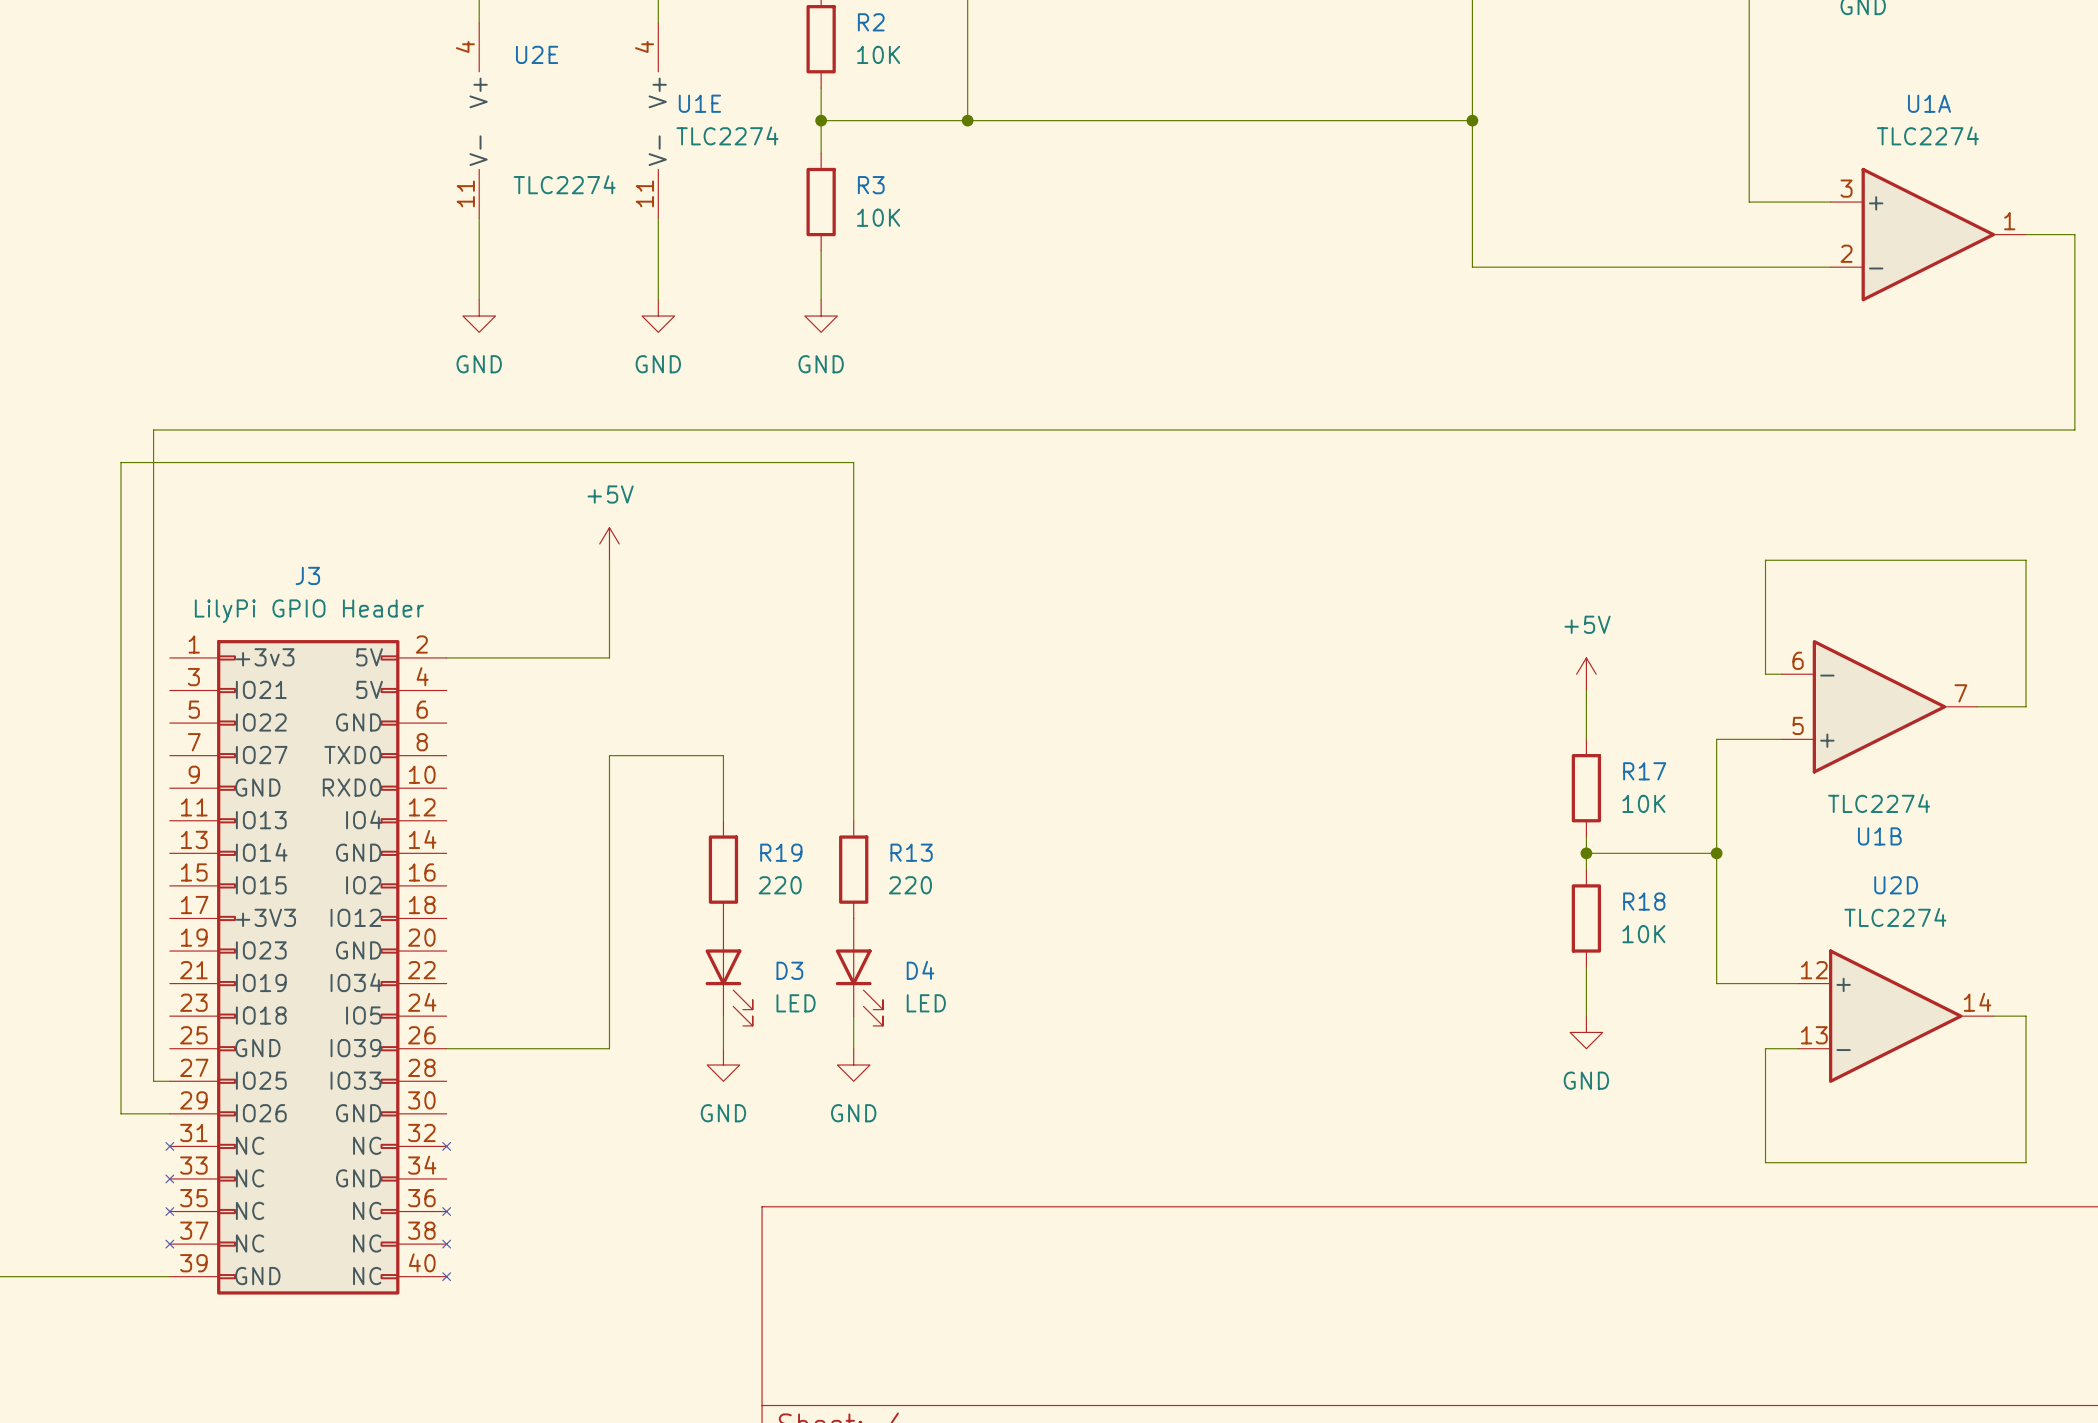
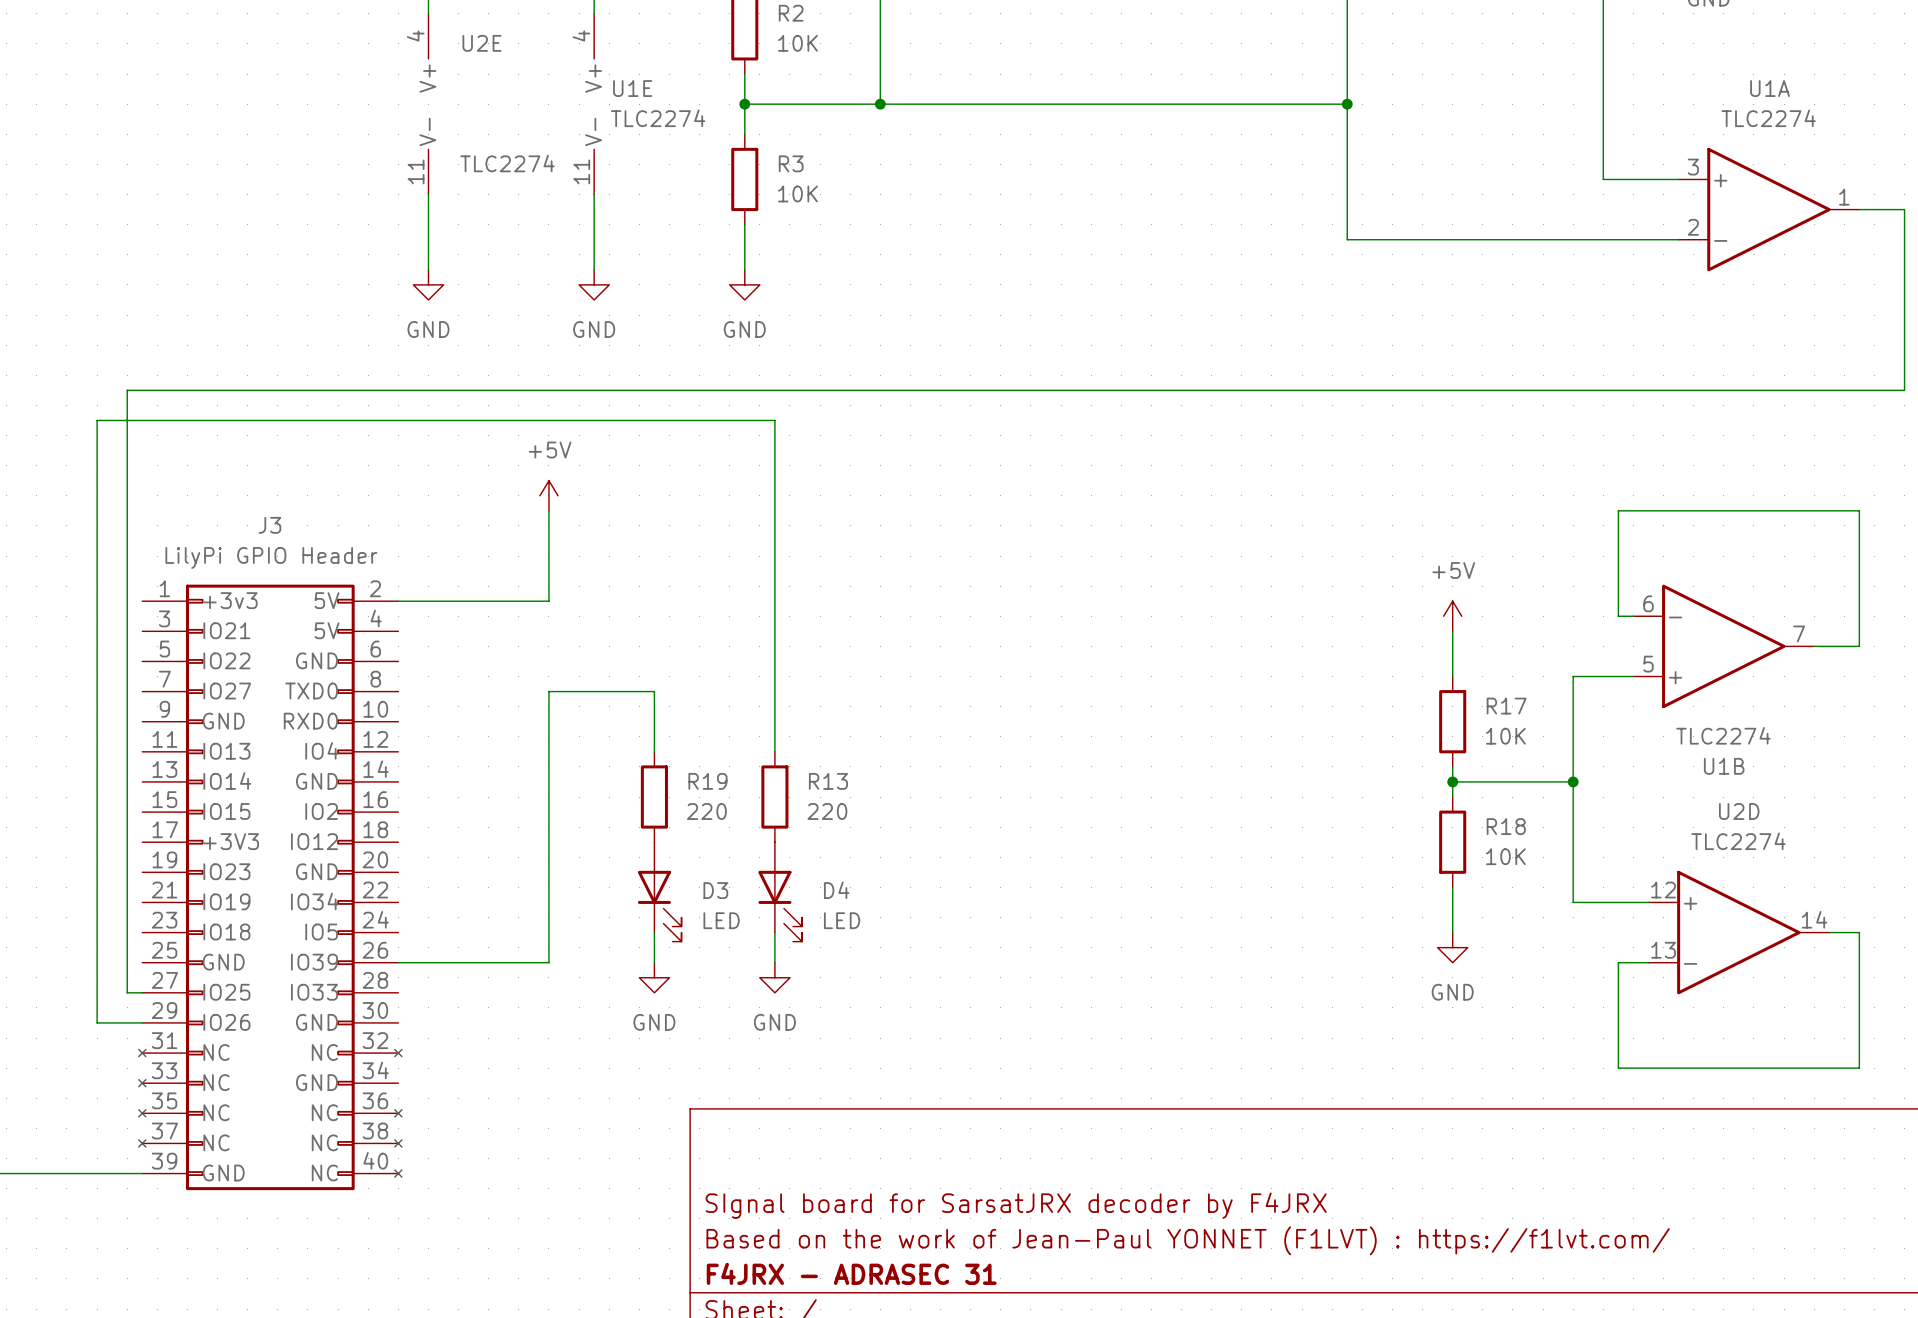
title block: none -> SIgnal board for SarsatJRX decoder by F4JRX (1016, 1205)
title block: none -> Based on the work of Jean-Paul YONNET (F1LVT) : https://f1lvt.com/ (1188, 1240)
title block: none -> F4JRX - ADRASEC 31 (851, 1273)

